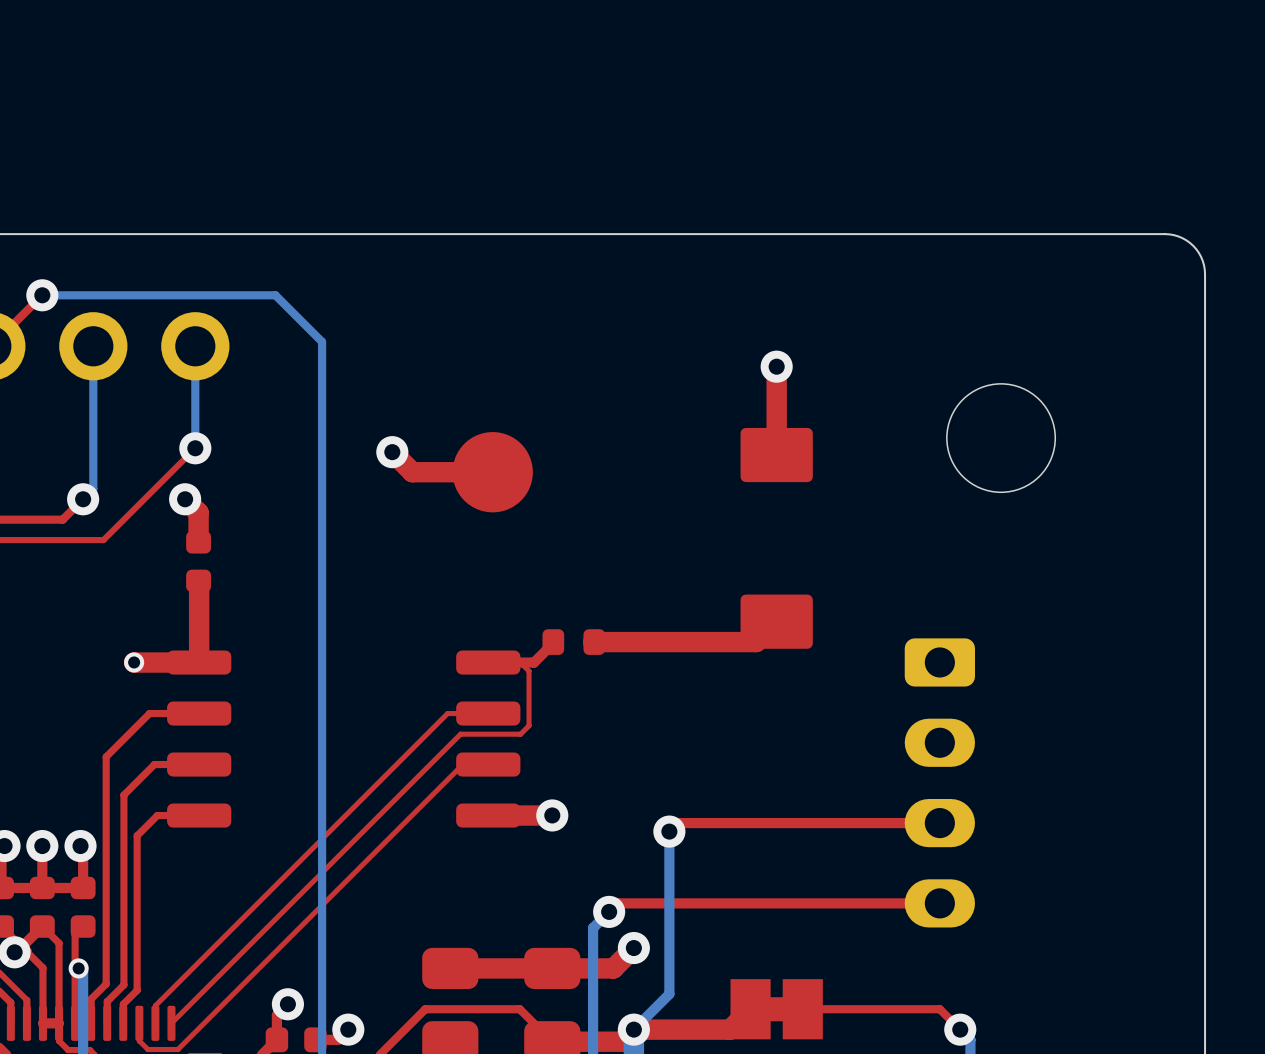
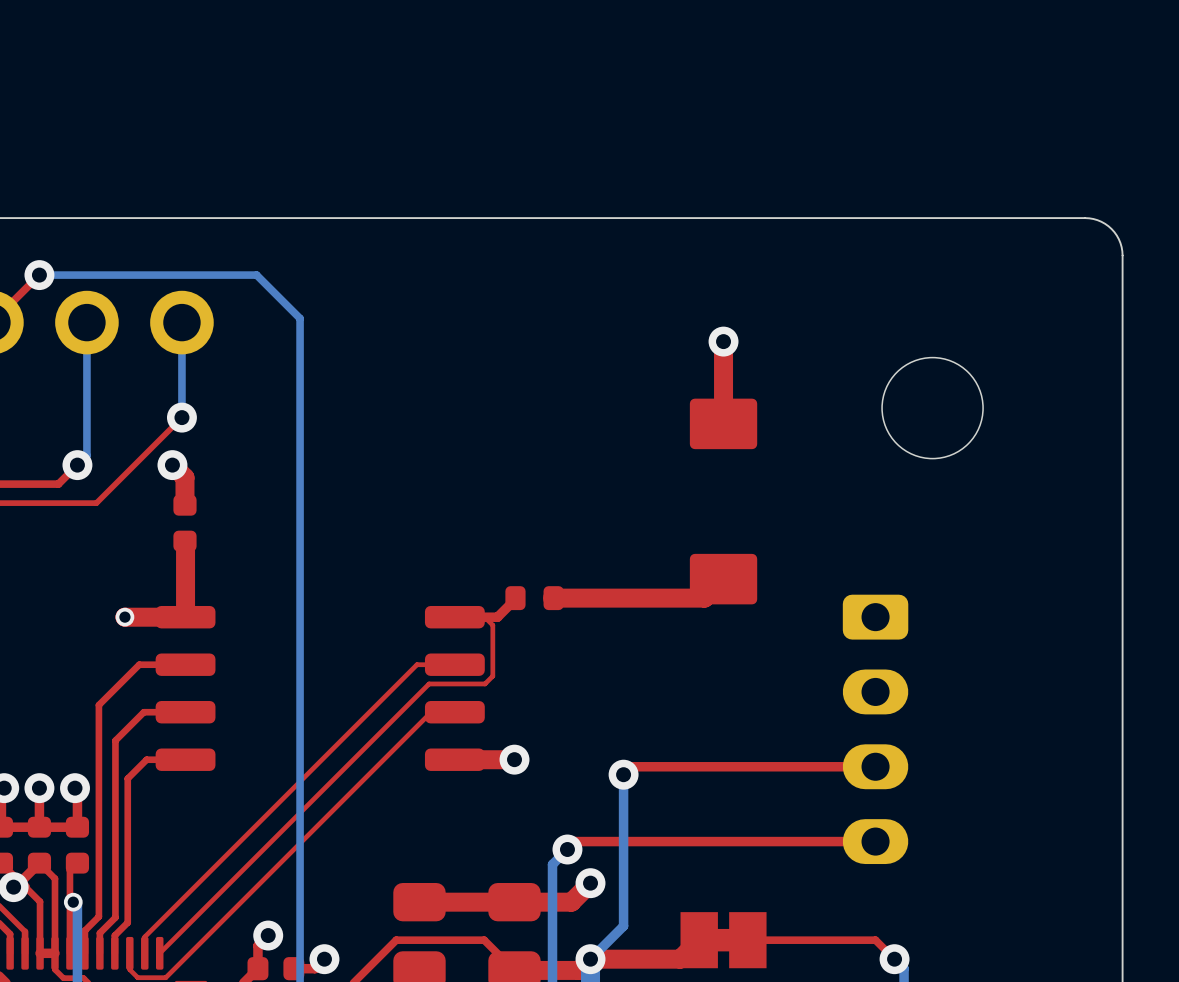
top track: (392, 452) (412, 472) (492, 472) -> none
via: (392, 452) -> none
part: (492, 472) -> none

